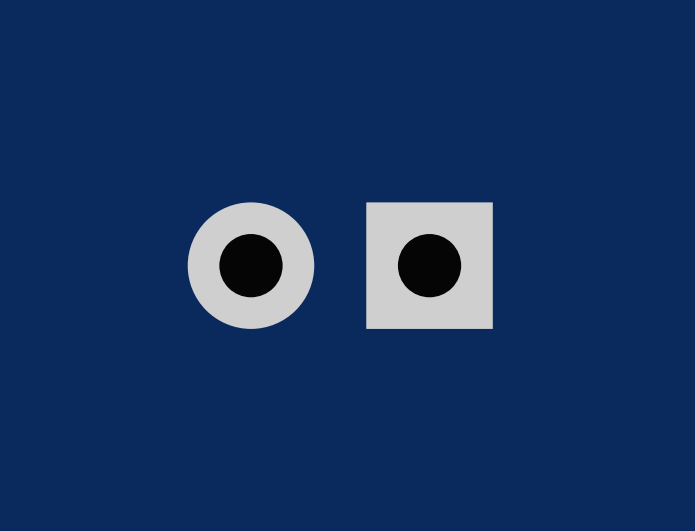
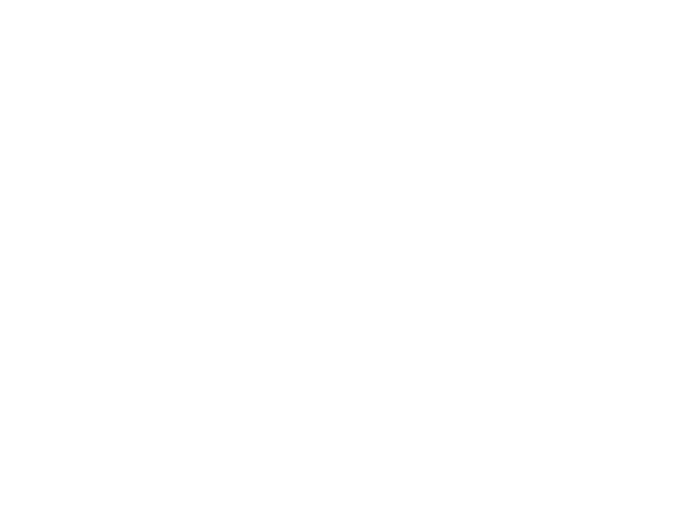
part: (340, 265) -> none

